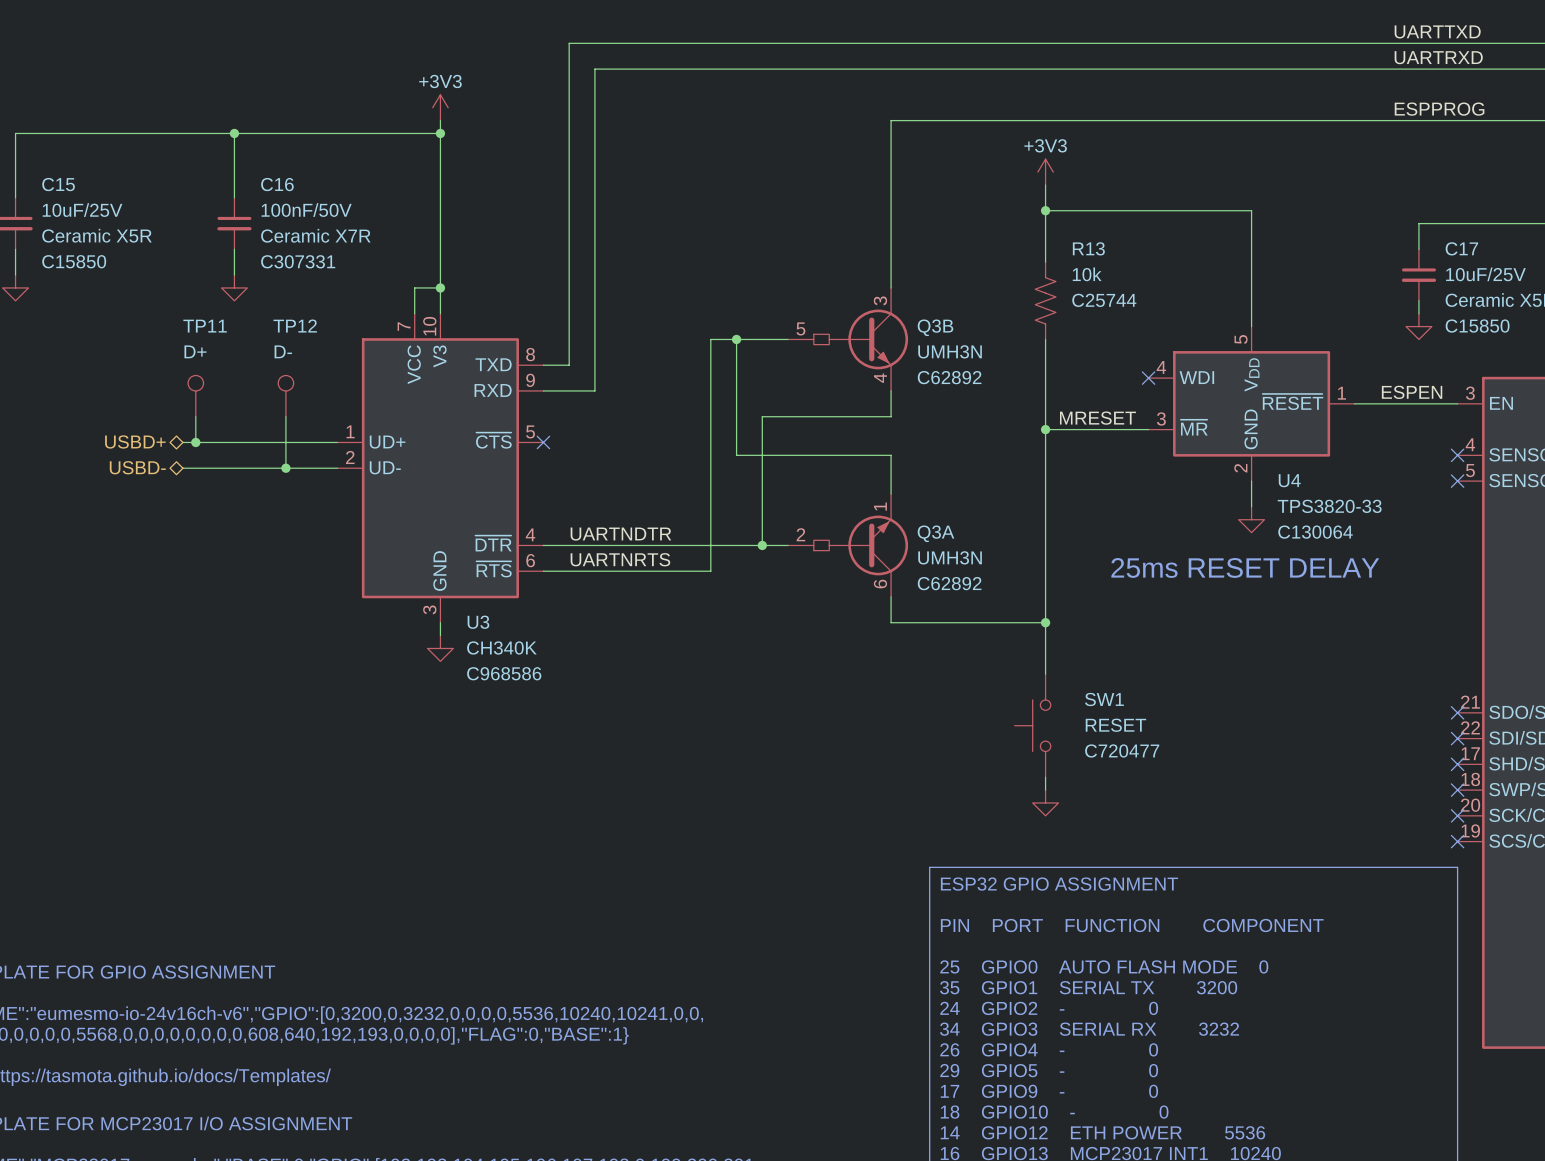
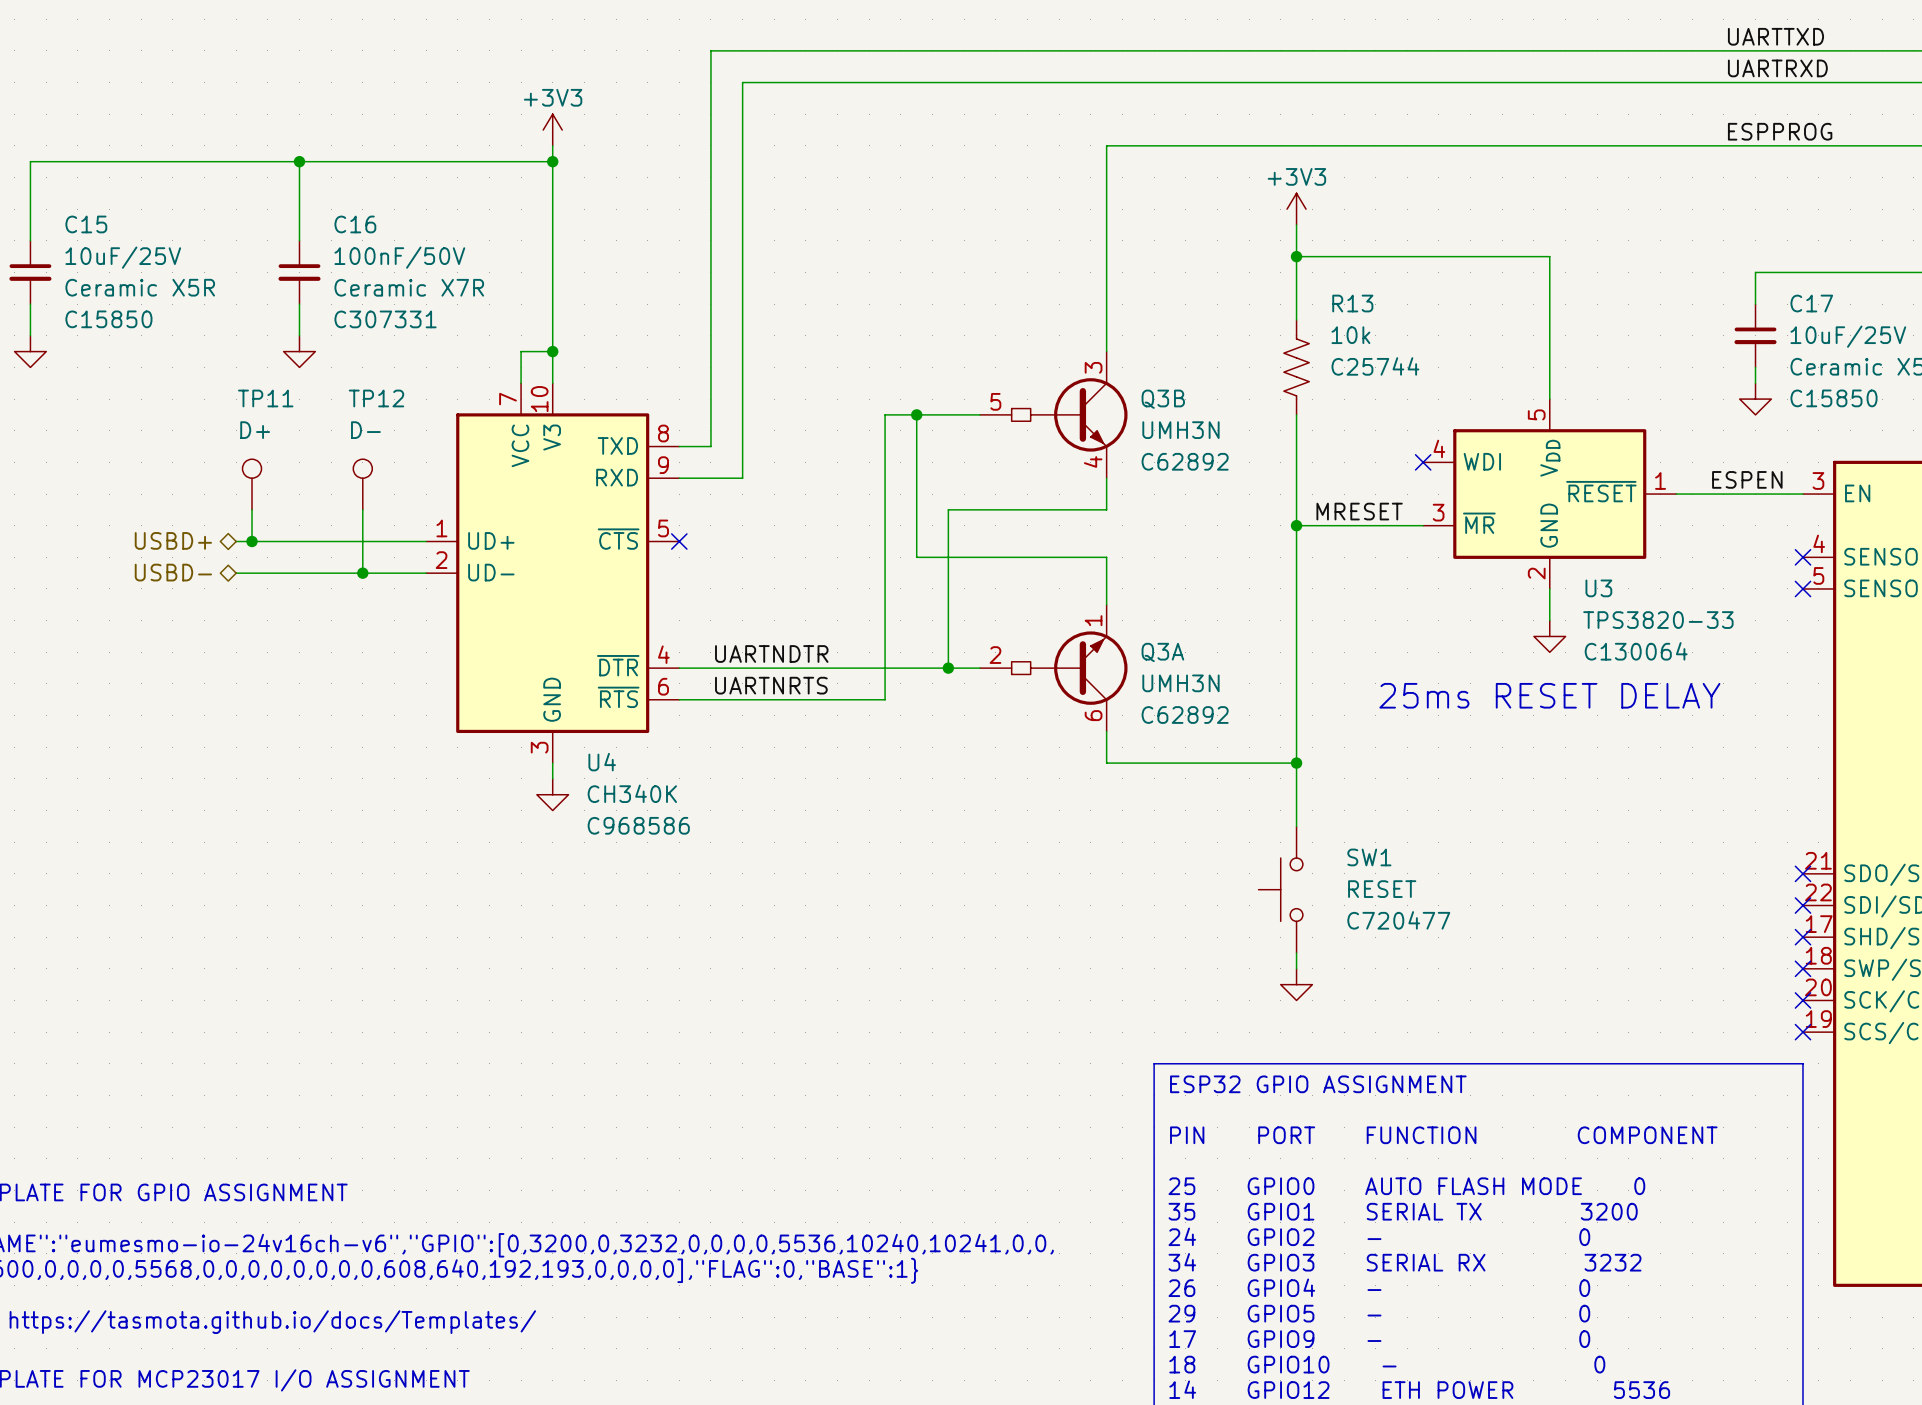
U4 name: U4 (1289, 480) -> U3 (1598, 588)
U3 name: U3 (478, 622) -> U4 (602, 762)

